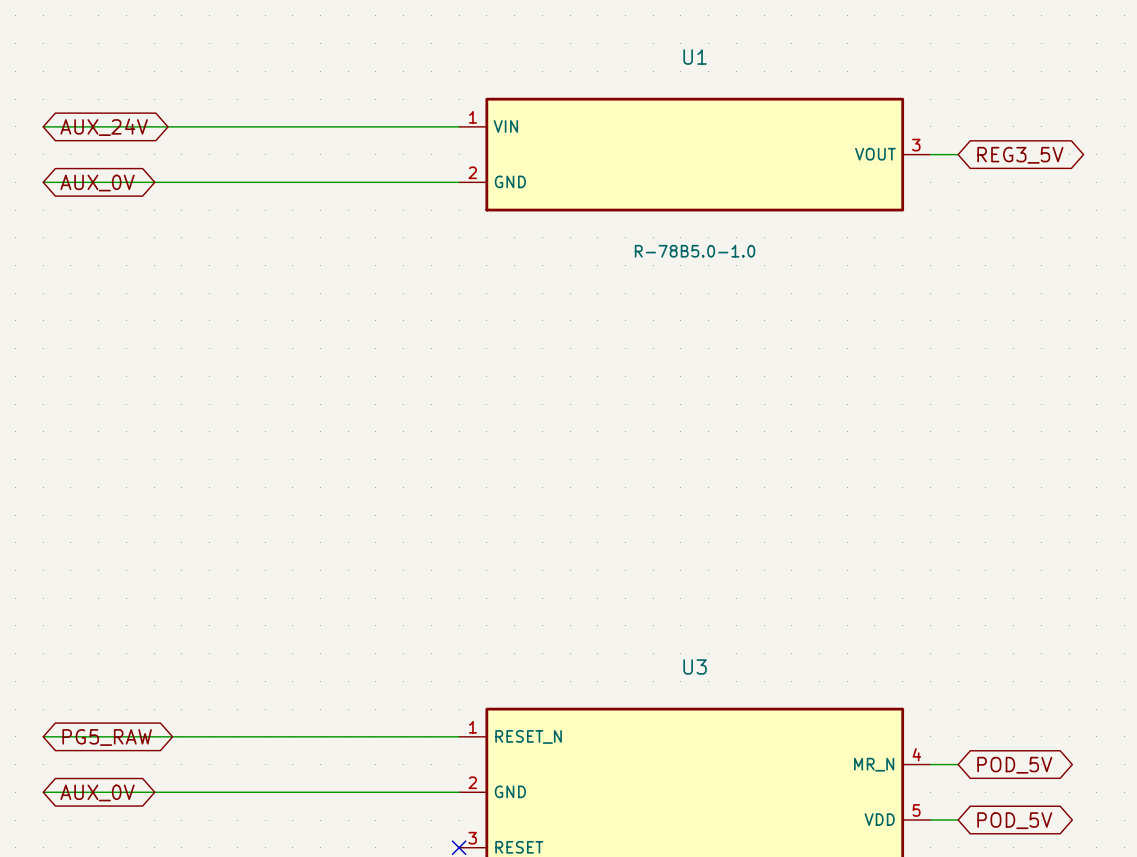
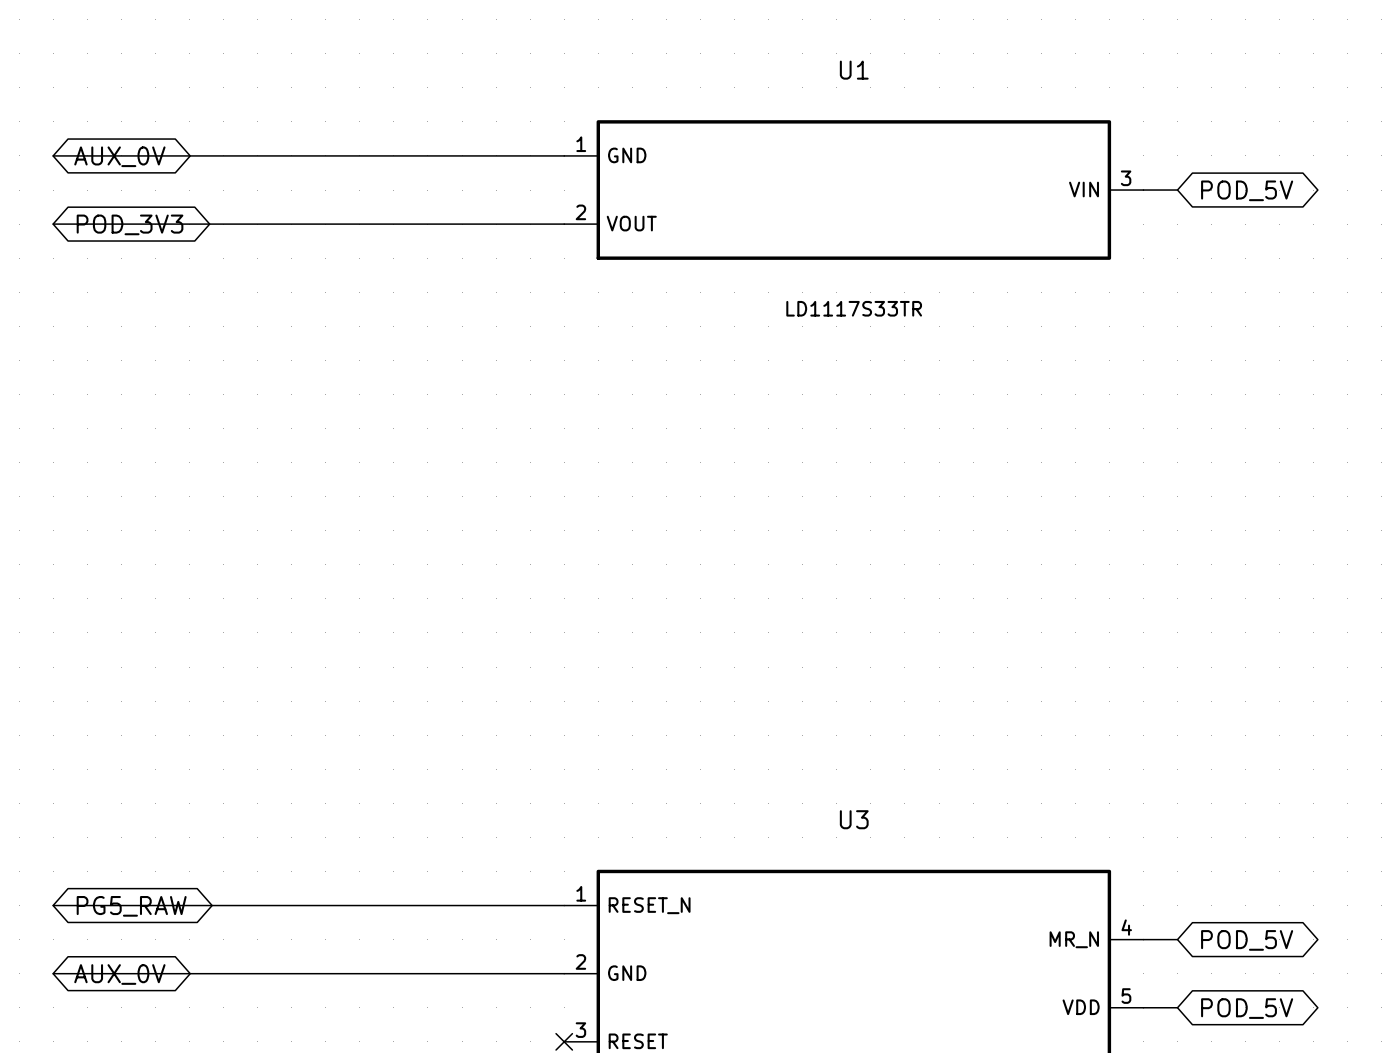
U1 pin name: VIN (505, 126) -> GND (627, 155)
global label: AUX_24V (104, 127) -> AUX_0V (119, 156)
U1 pin name: VOUT (875, 154) -> VIN (1084, 189)
global label: REG3_5V (1020, 155) -> POD_5V (1247, 190)
U1 pin name: GND (510, 181) -> VOUT (631, 223)
global label: AUX_0V (97, 183) -> POD_3V3 (130, 224)
U1 value: R-78B5.0-1.0 (695, 251) -> LD1117S33TR (854, 308)

